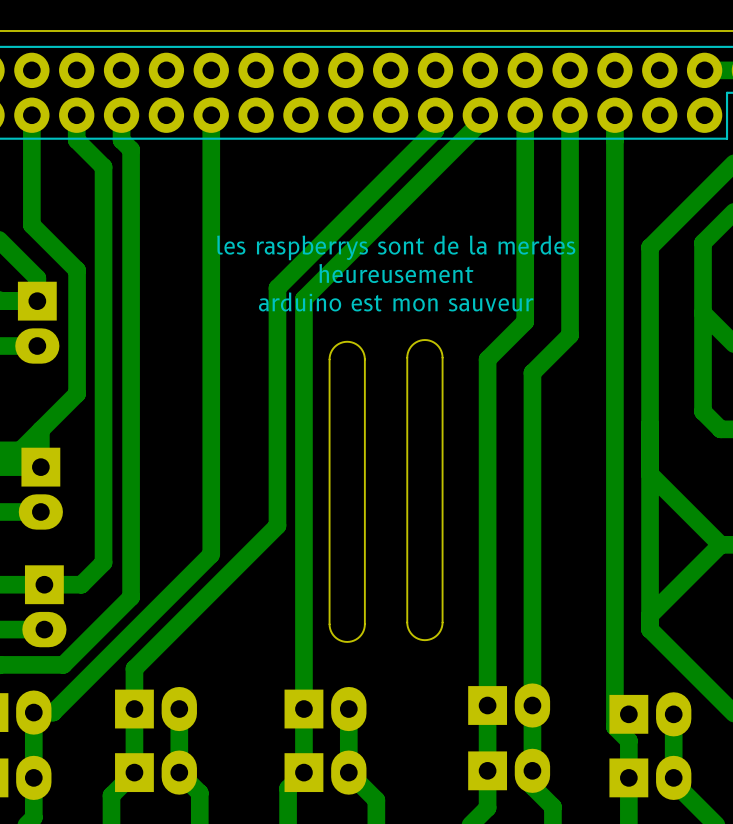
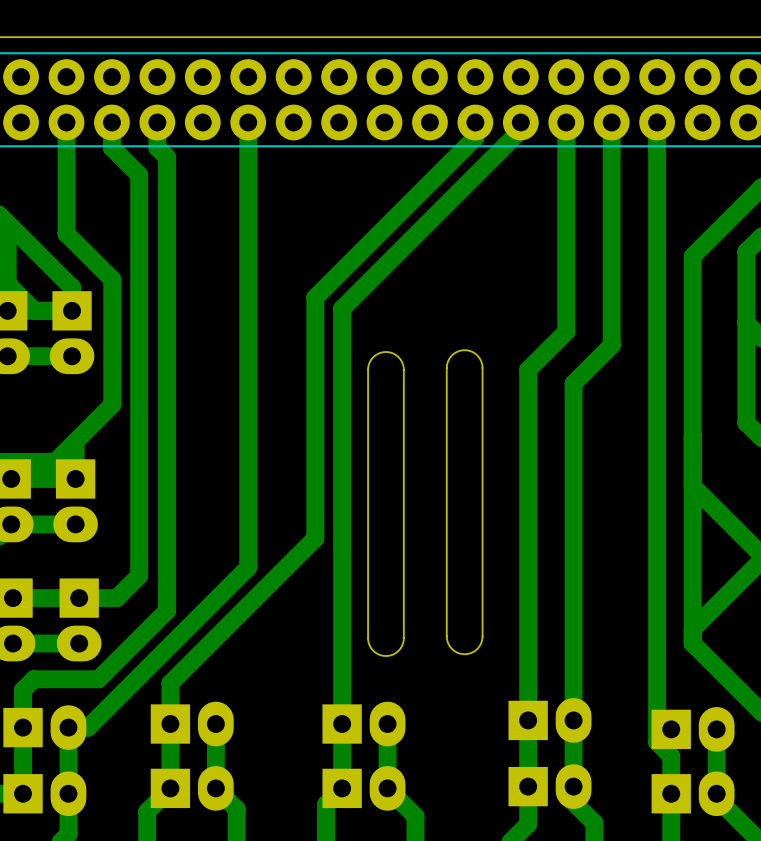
text: les raspberrys sont de la merdes (396, 247) -> none
text: heureusement (396, 273) -> none
text: arduino est mon sauveur (396, 301) -> none

